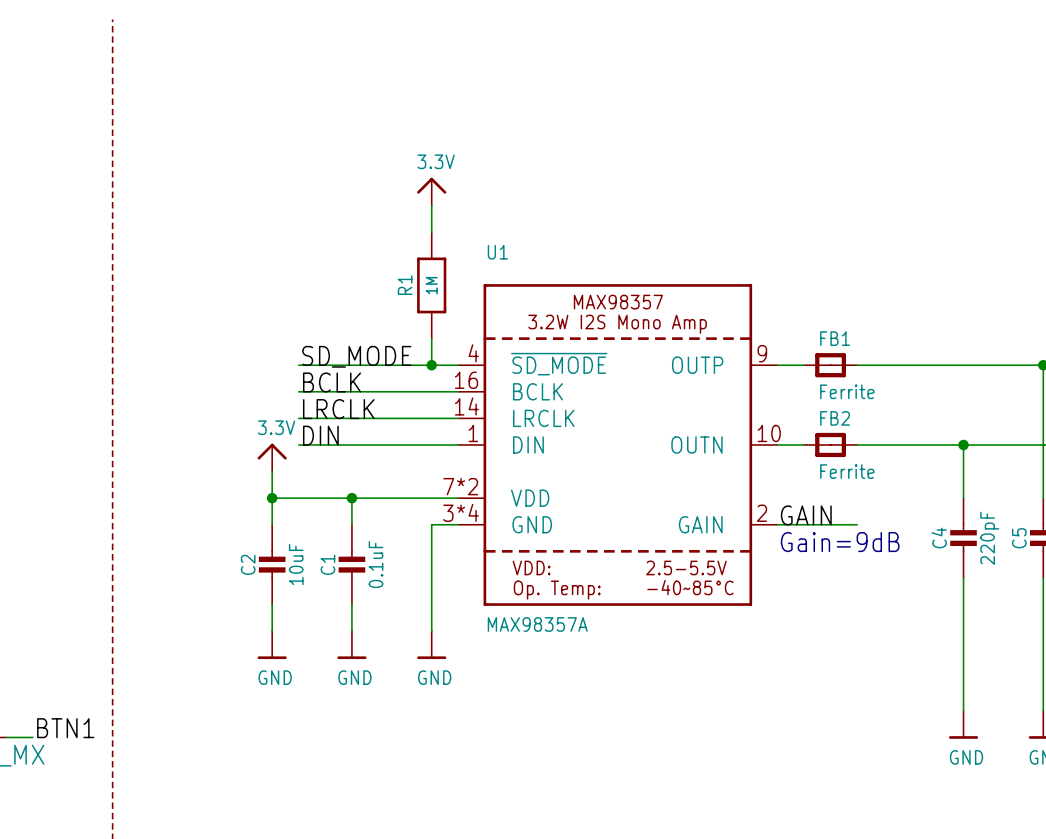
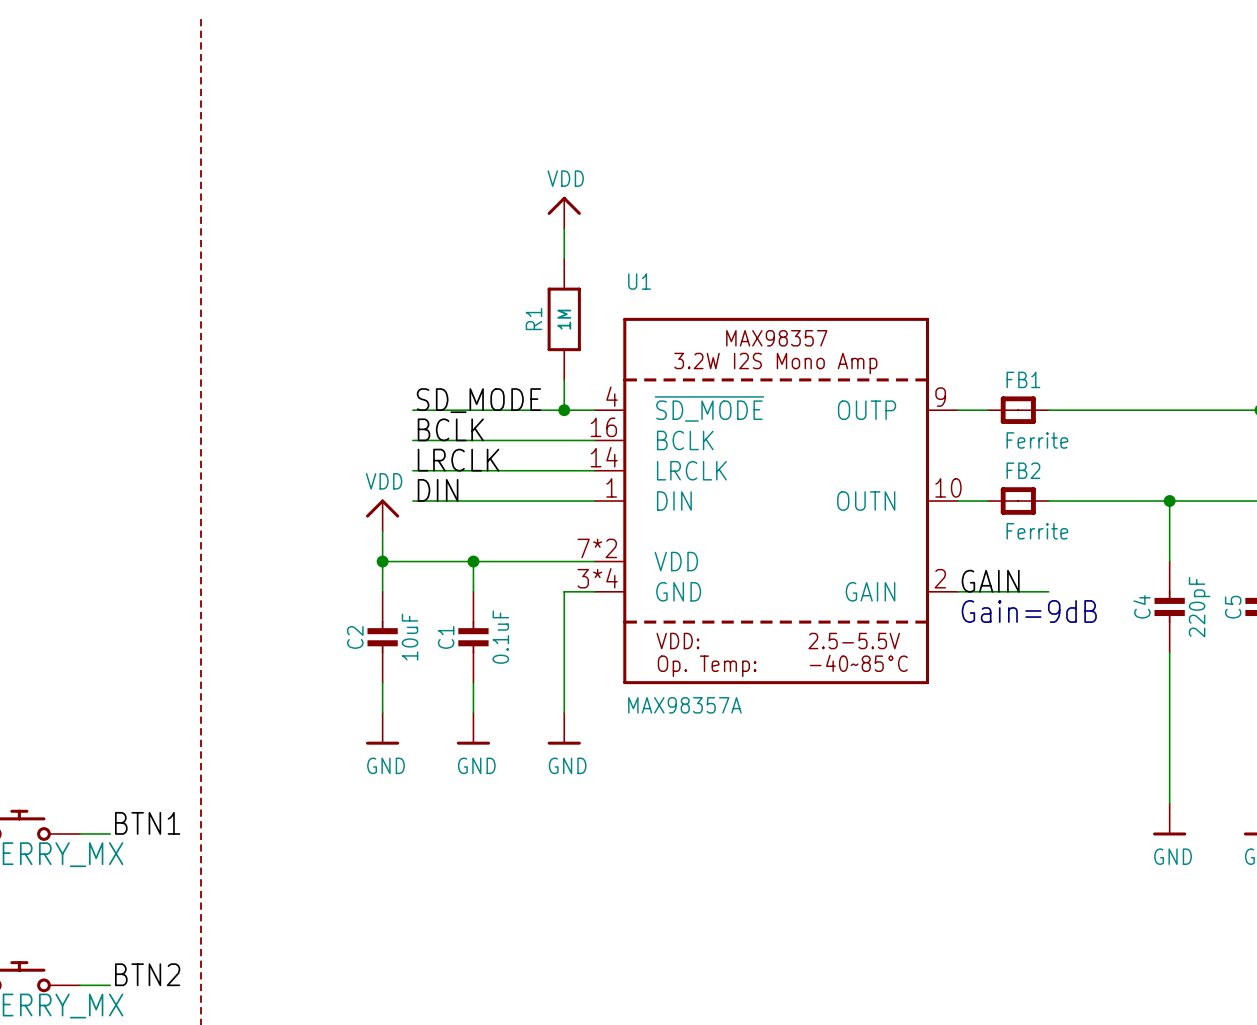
power symbol: 3.3V (431, 191) -> VDD (564, 212)
power symbol: 3.3V (272, 457) -> VDD (382, 515)

